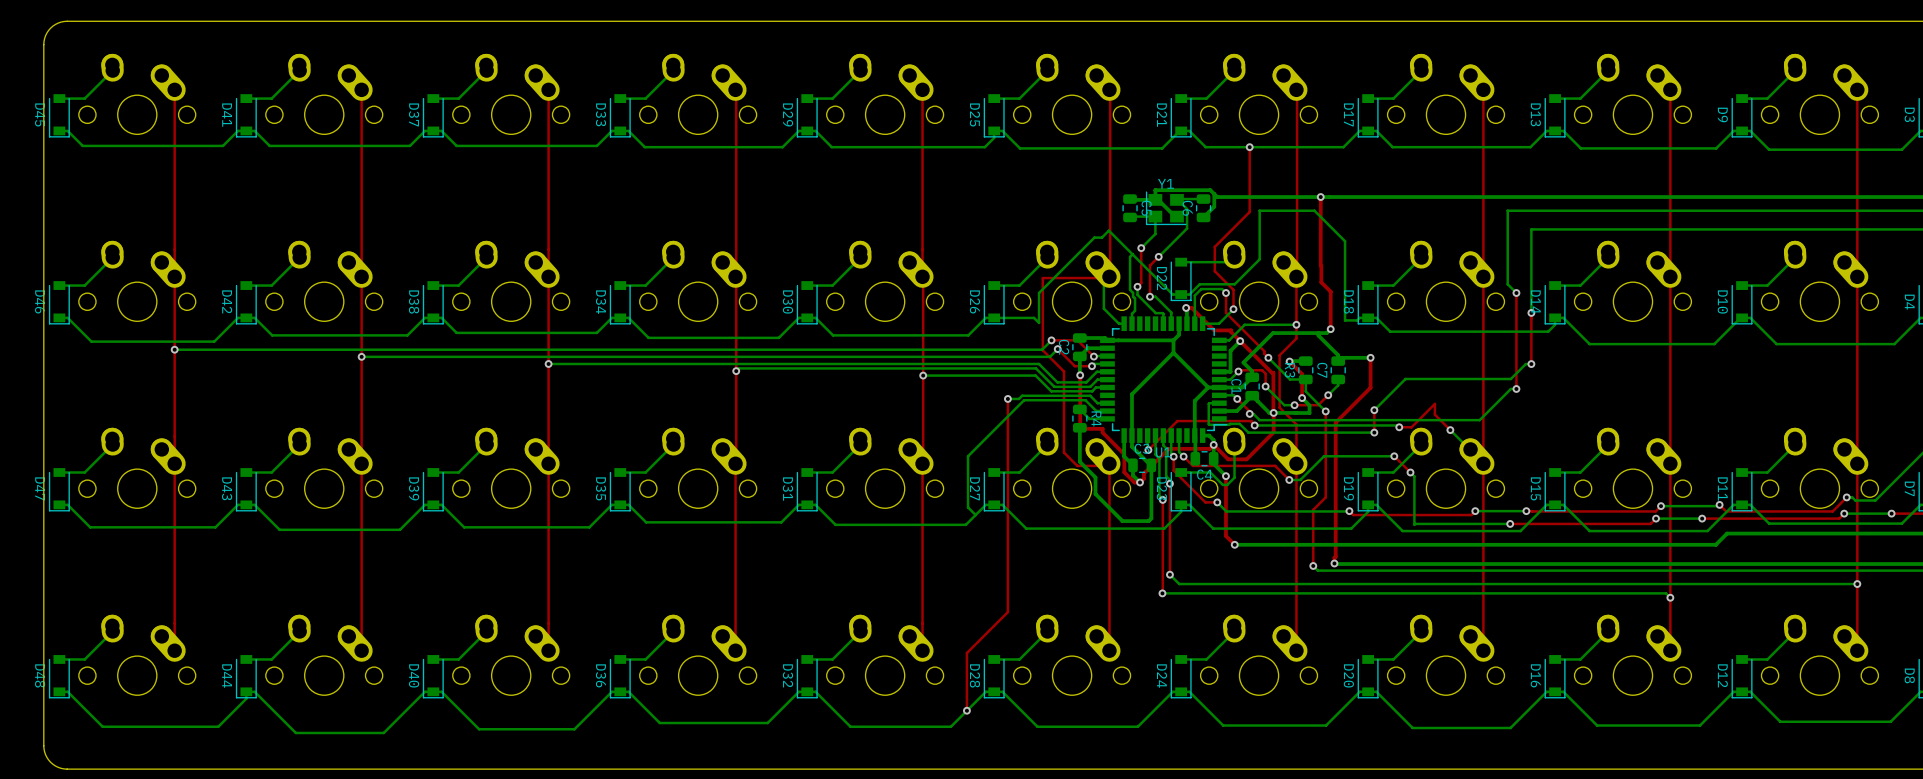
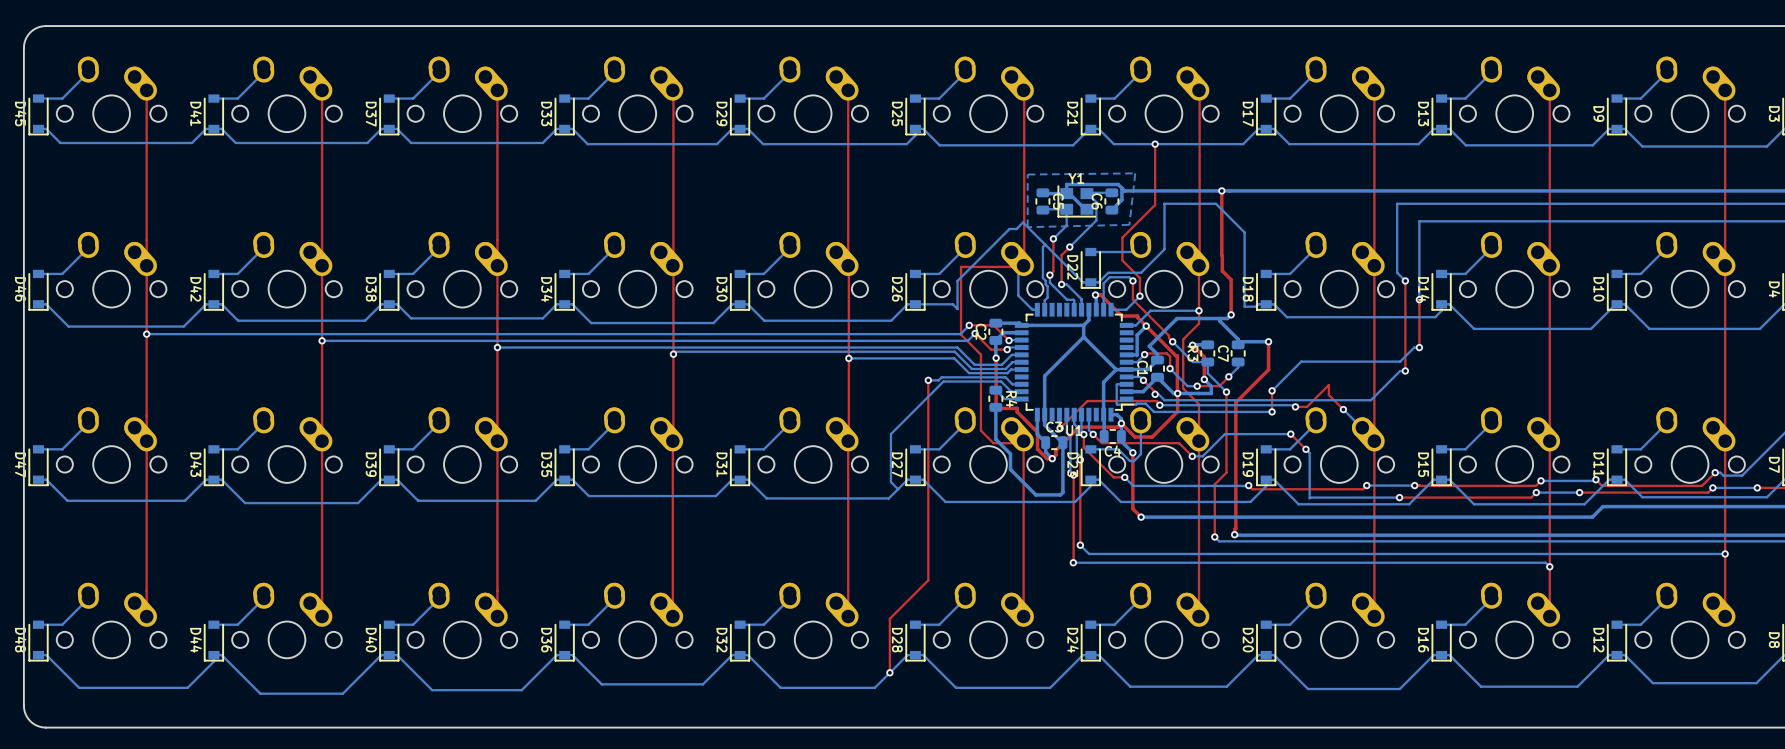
bottom zone outline: none -> (1135, 173) (1027, 174) (1027, 227) (1129, 224) (1135, 173)

